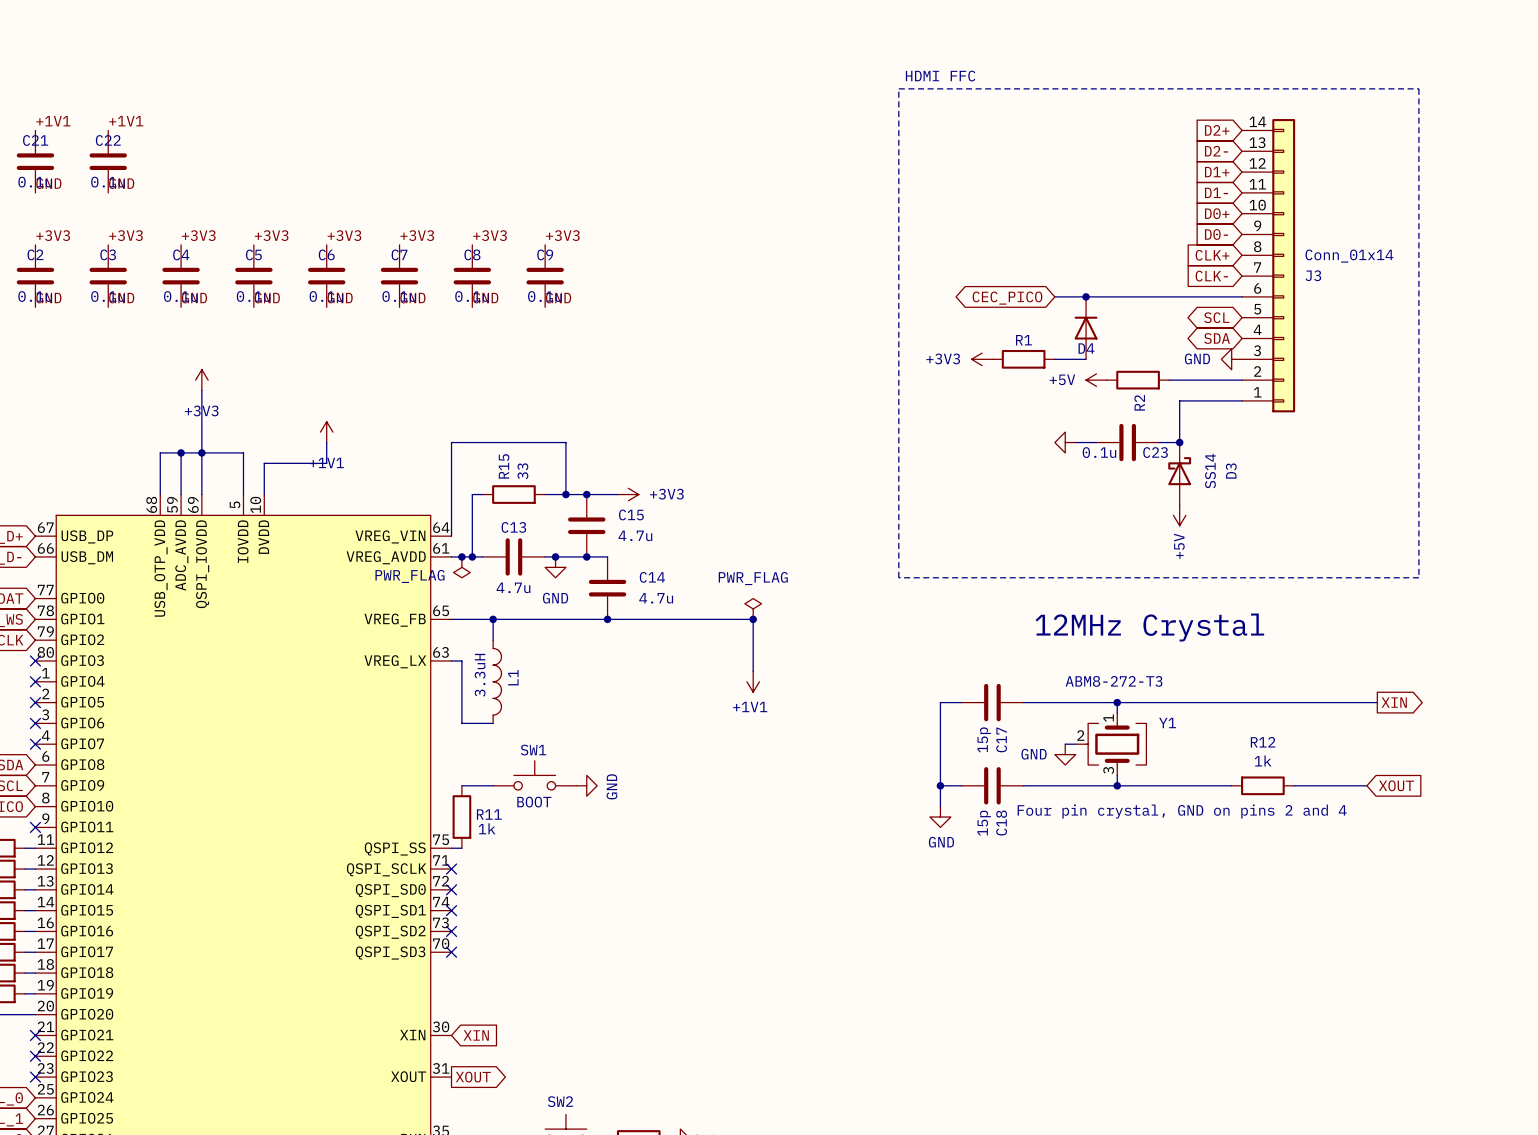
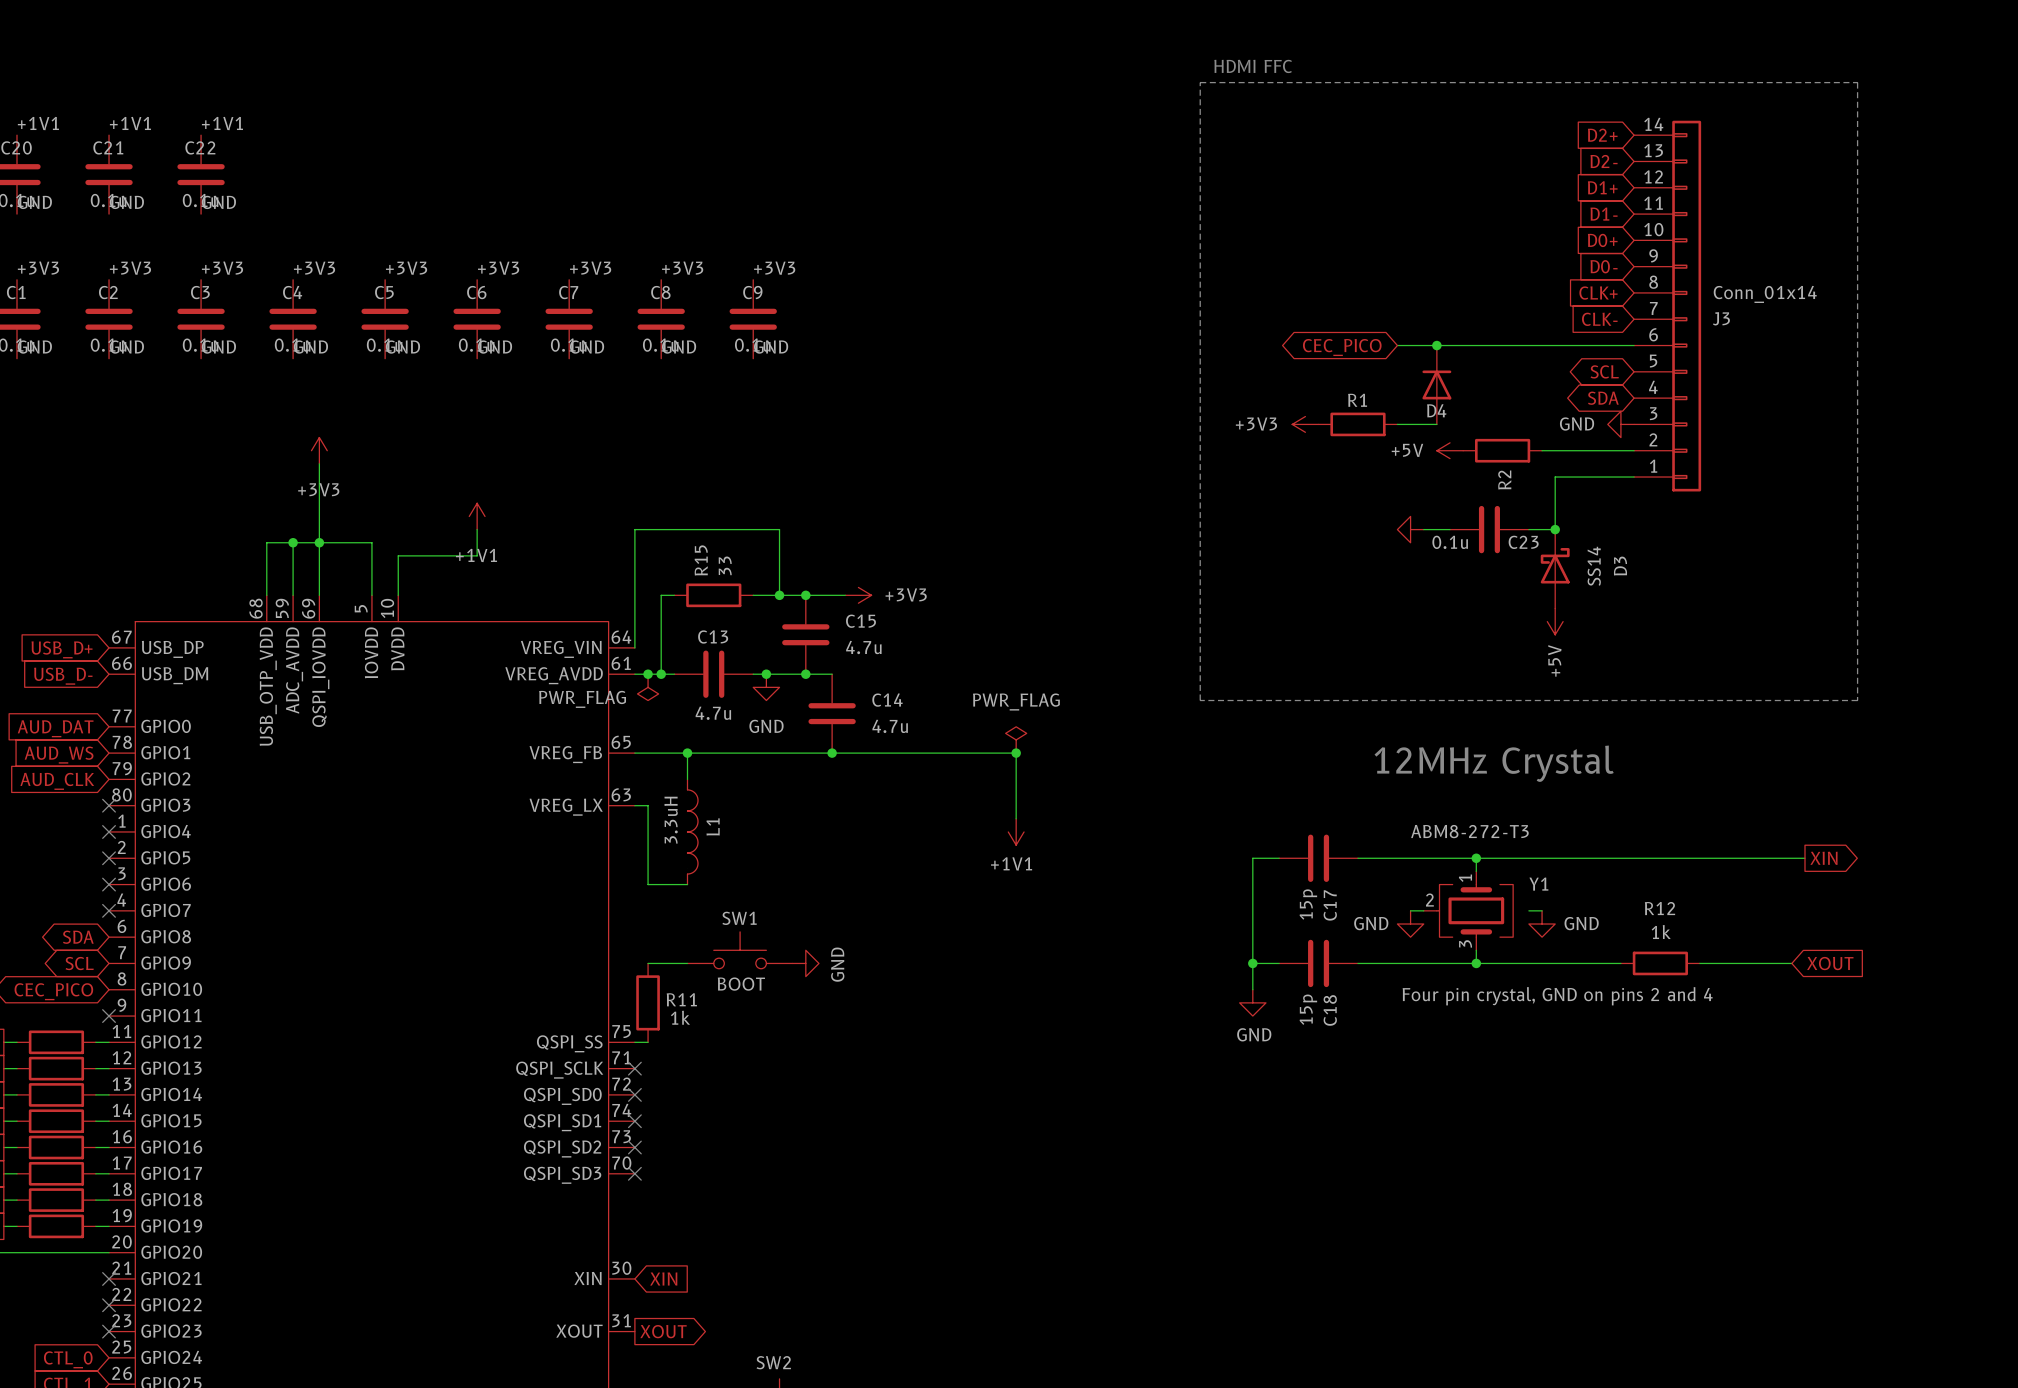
wire: none -> (1528, 910) (1542, 910)
power symbol: none -> GND (1542, 924)

